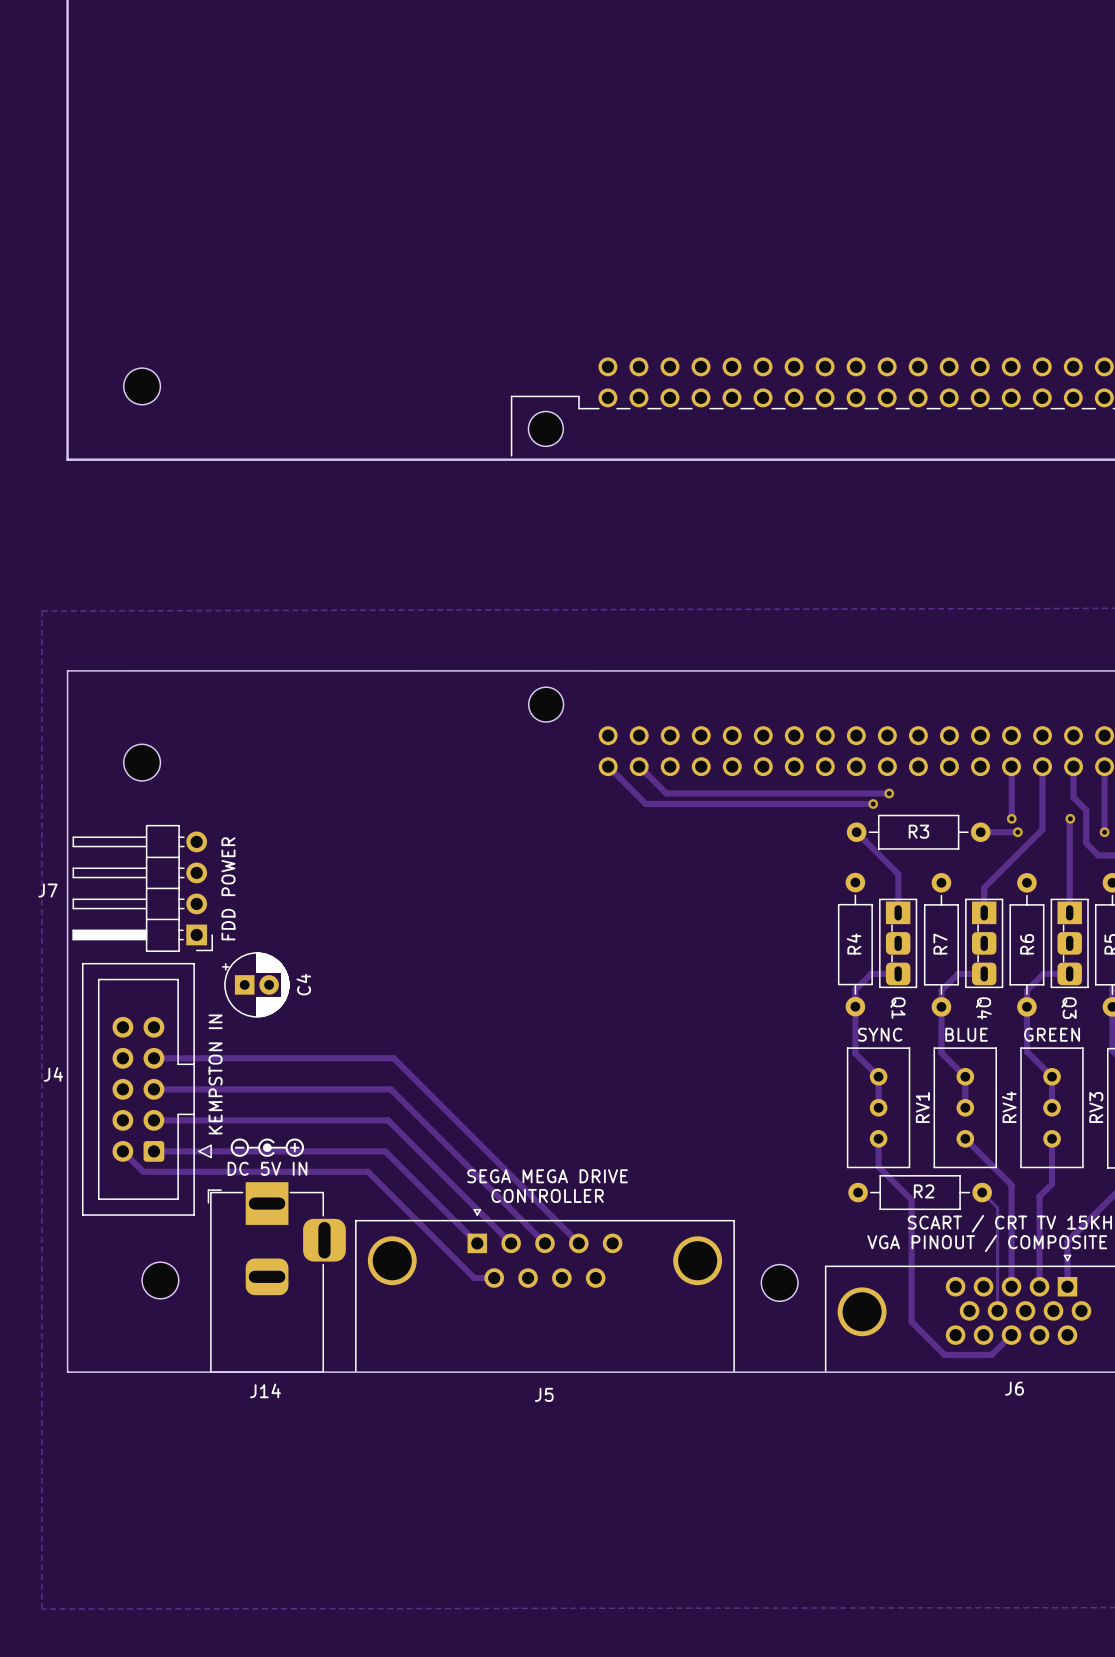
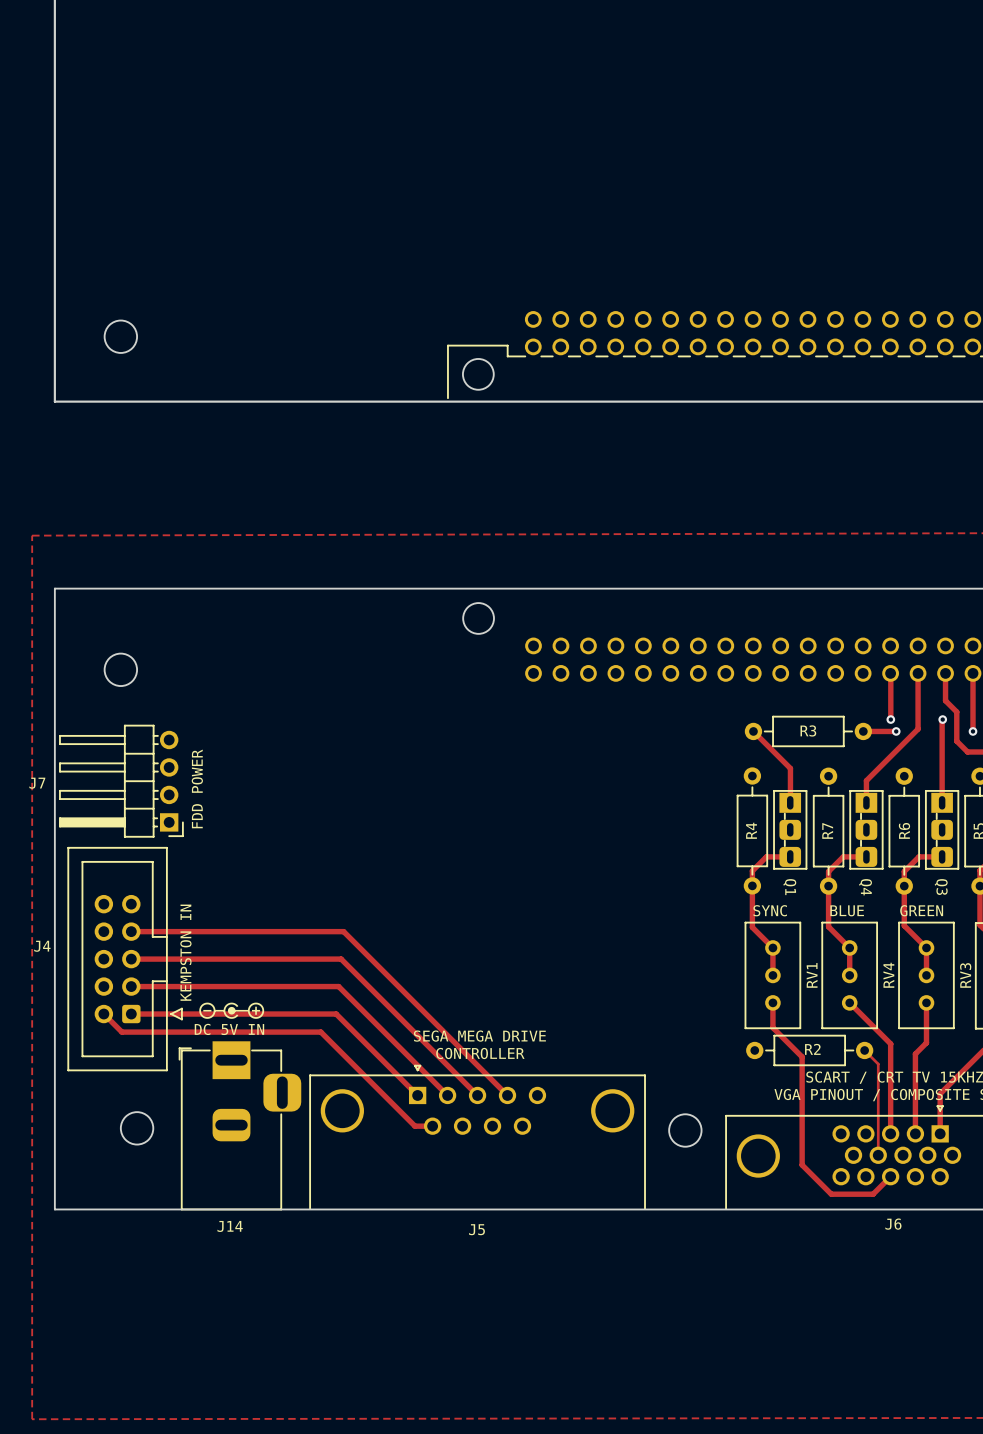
track: (608, 766) (645, 804) (873, 804) -> none
track: (639, 766) (666, 793) (889, 793) -> none
via: (889, 793) -> none
via: (873, 804) -> none
C4: (255, 984) -> none

